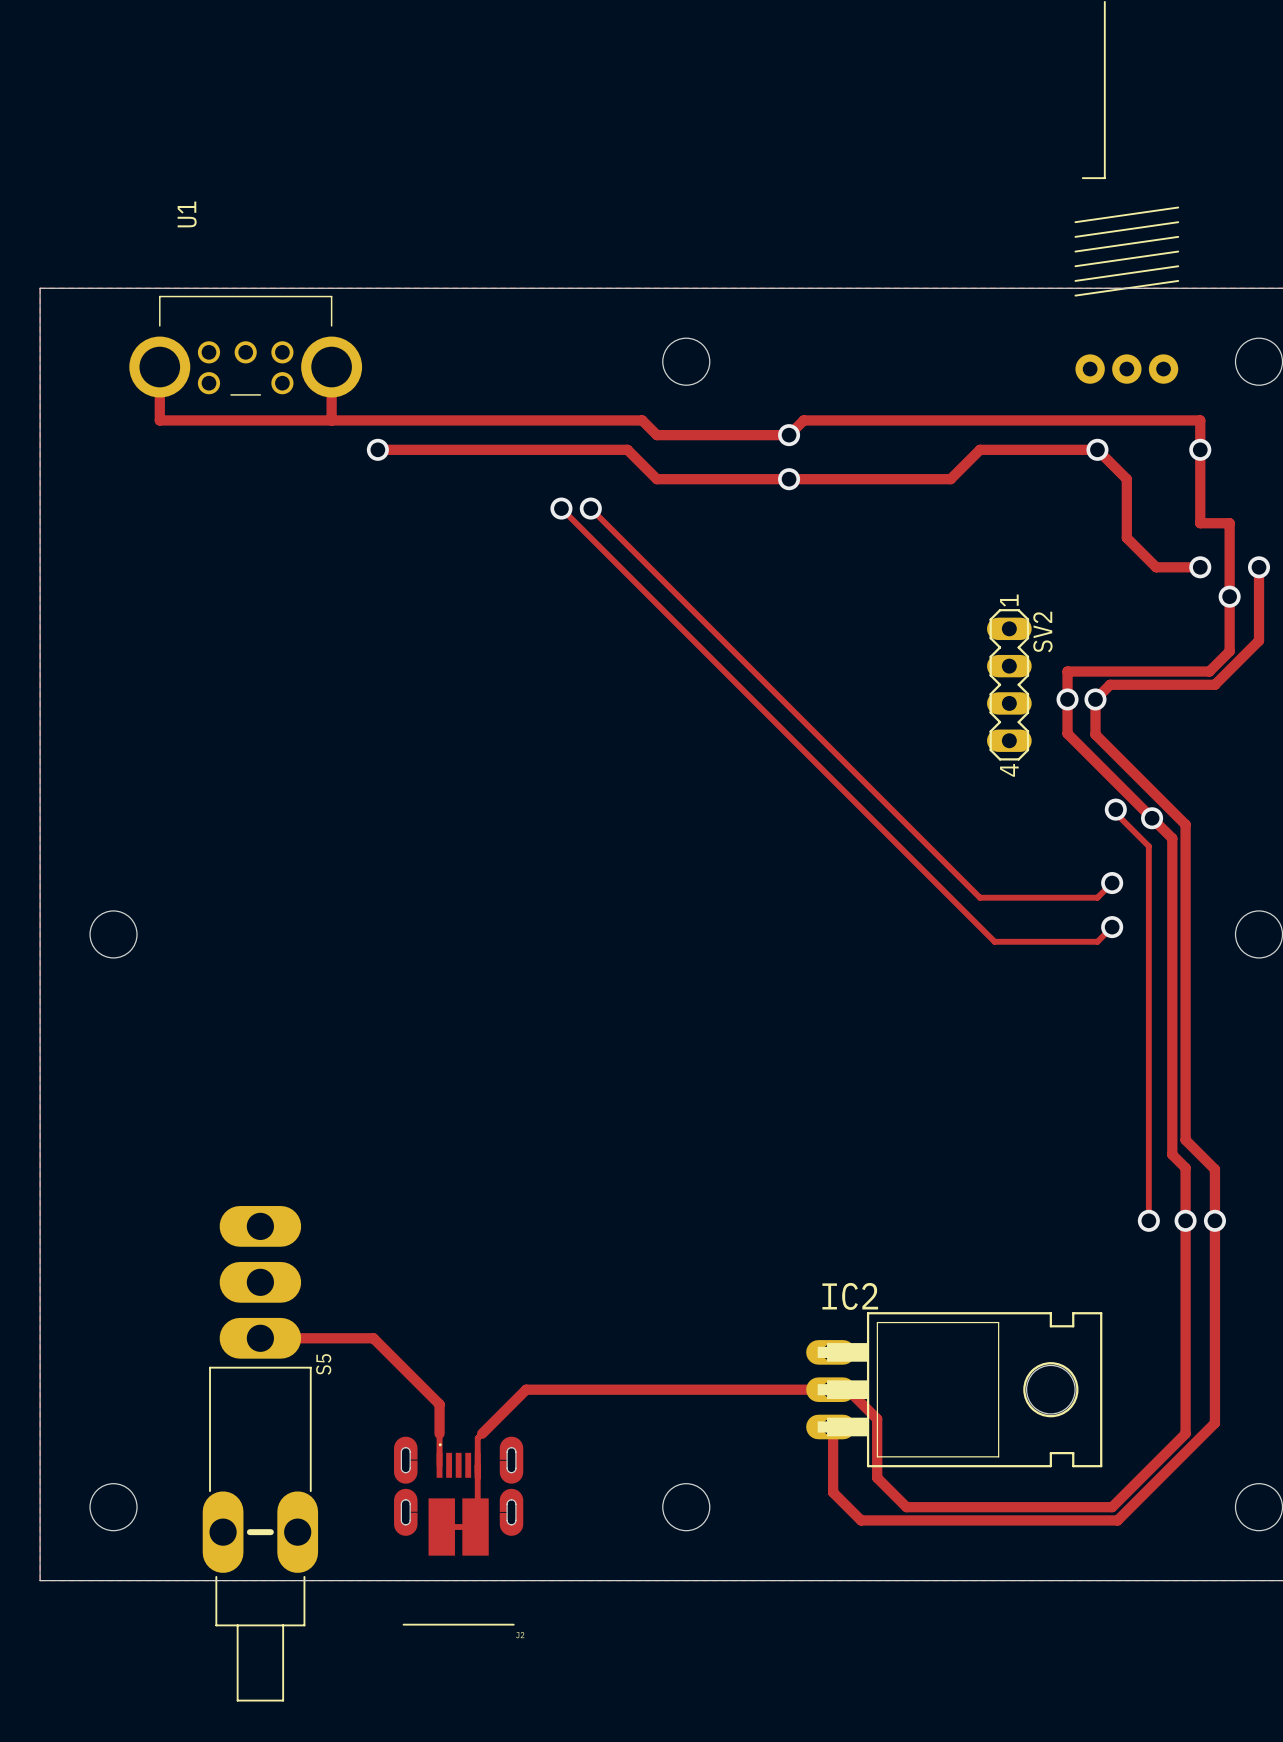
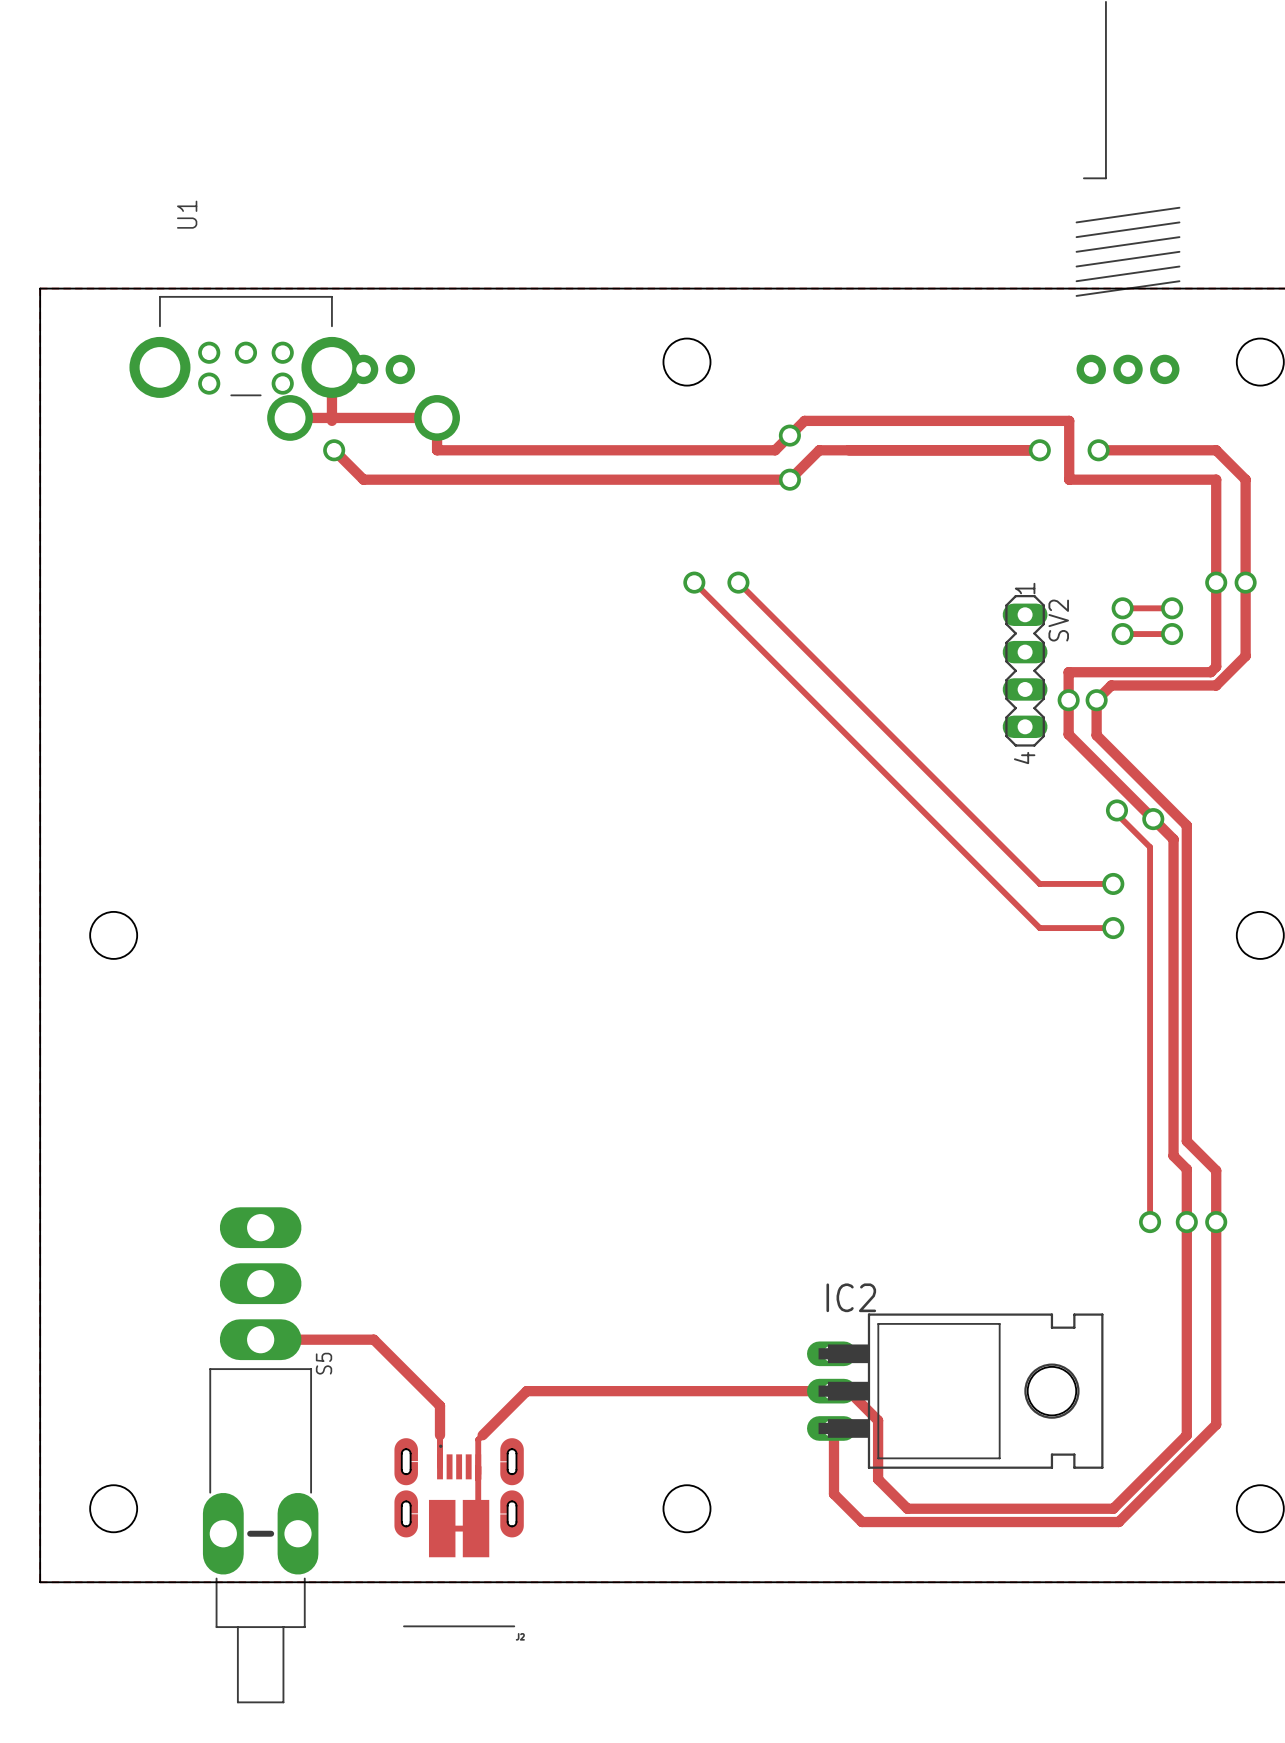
track: (159, 367) (159, 420) (642, 420) (656, 435) (789, 435) -> none
part: none -> (363, 397)
track: (1068, 420) (1200, 420) (1200, 523) (1229, 523) (1229, 651) (1214, 666) -> (1069, 420) (1069, 479) (1216, 479) (1216, 666)
track: none -> (334, 450) (363, 479) (657, 479)
track: (377, 449) (436, 449) -> (290, 417) (437, 417) (437, 450)
via position: (377, 449) -> (334, 450)
track: (627, 449) (656, 479) -> (628, 450) (775, 450) (789, 435)
track: (979, 449) (950, 479) (789, 479) -> (981, 450) (819, 450) (789, 479)
track: (1038, 449) (1097, 449) (1126, 479) (1126, 537) (1156, 567) (1200, 567) -> none
via: none -> (1039, 450)
via: (1200, 449) -> none
track: (561, 508) (994, 941) (1097, 941) (1112, 927) -> (694, 582) (1039, 928) (1113, 928)
via: (561, 508) -> none
track: (590, 508) (979, 897) (1097, 897) (1112, 883) -> (738, 582) (1039, 883) (1113, 883)
via: (590, 508) -> none
via: (1200, 567) -> none
track: (1259, 567) (1259, 640) (1244, 655) -> (1098, 450) (1216, 450) (1245, 479) (1245, 656)
via: (1259, 567) -> none
via: none -> (694, 582)
via: none -> (738, 582)
via: none -> (1216, 582)
via: none -> (1245, 582)
via: (1229, 596) -> none
track: none -> (1122, 608) (1172, 608)
via: none -> (1122, 608)
via: none -> (1172, 608)
track: none -> (1122, 634) (1172, 634)
via: none -> (1122, 634)
via: none -> (1172, 634)
SV2 position: (1009, 684) -> (1025, 670)

